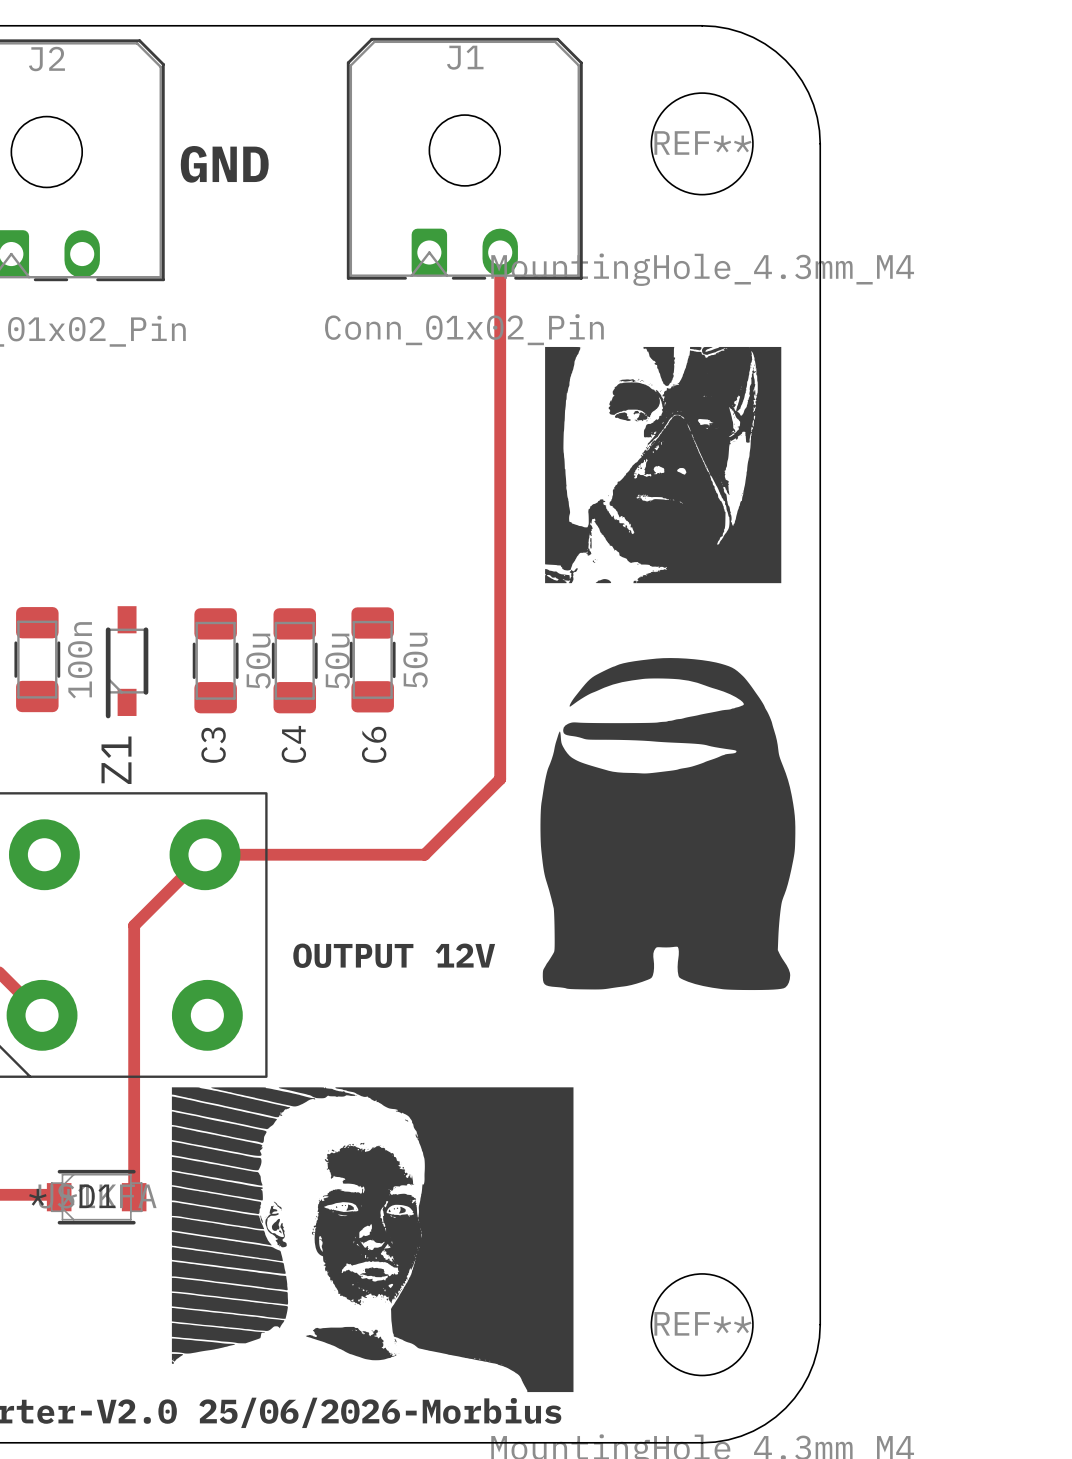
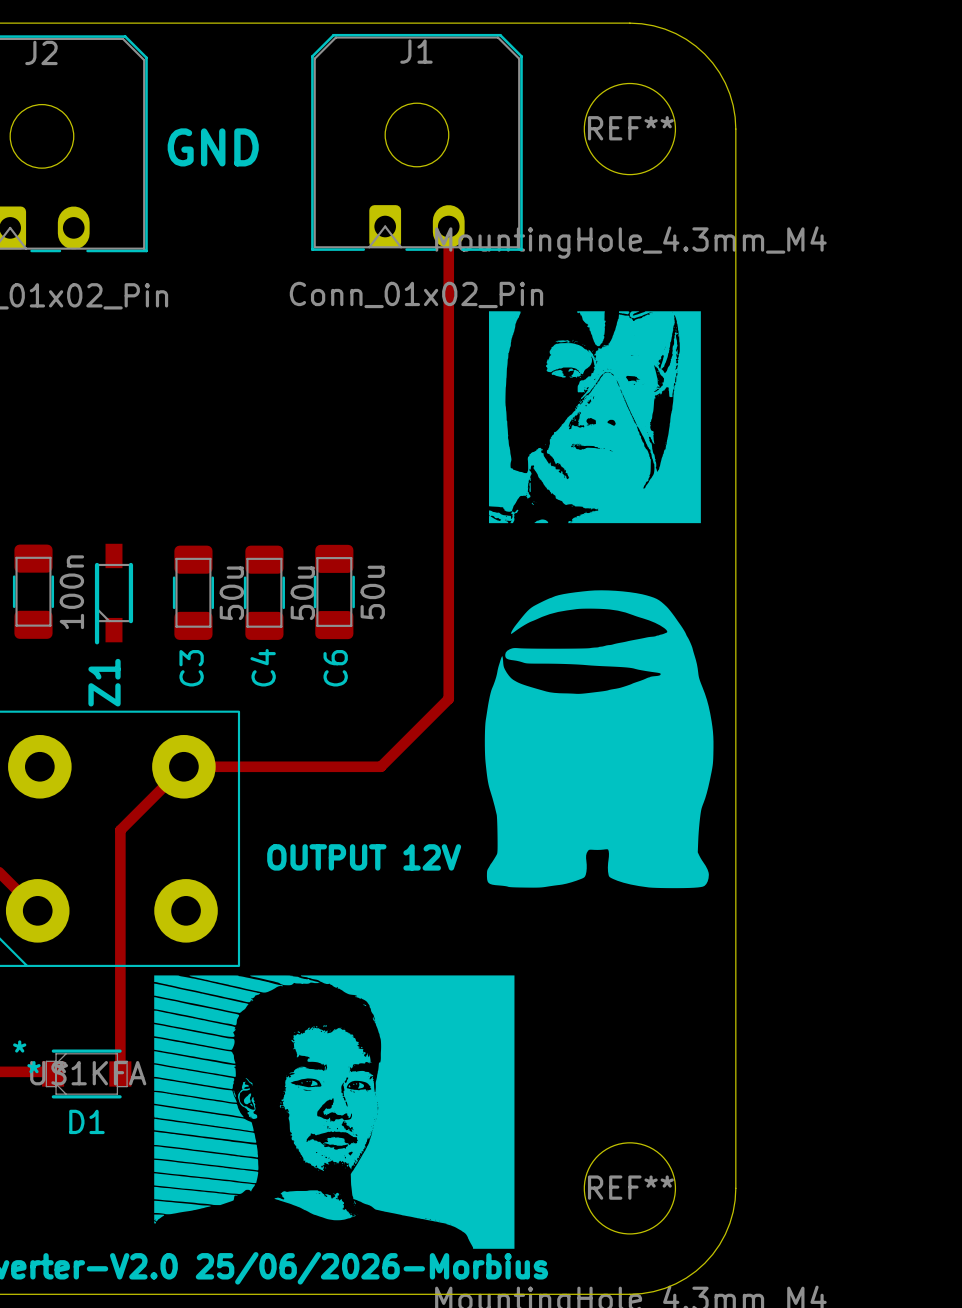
drawing: none -> [154, 975, 515, 1249]
D1 text: none -> * (19, 1046)
D1 name position: D1 (97, 1196) -> D1 (86, 1121)
part: (372, 1239) -> none

